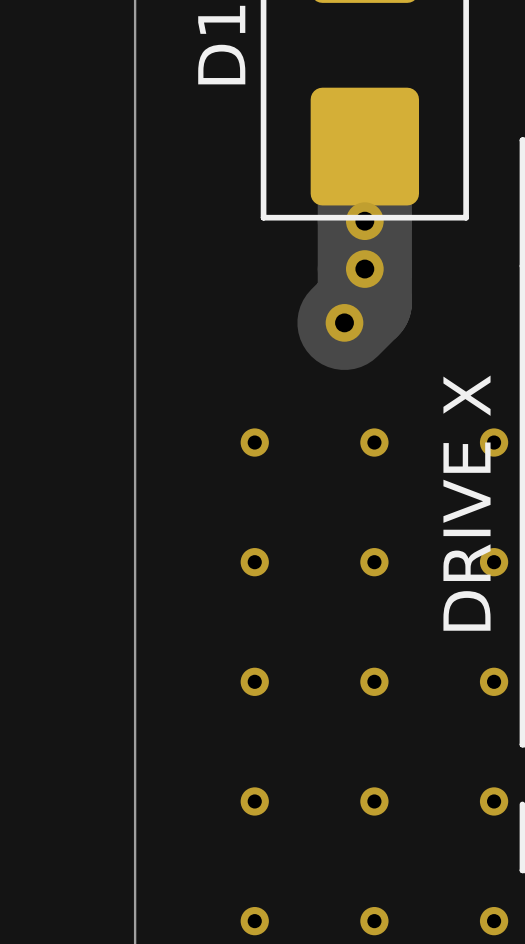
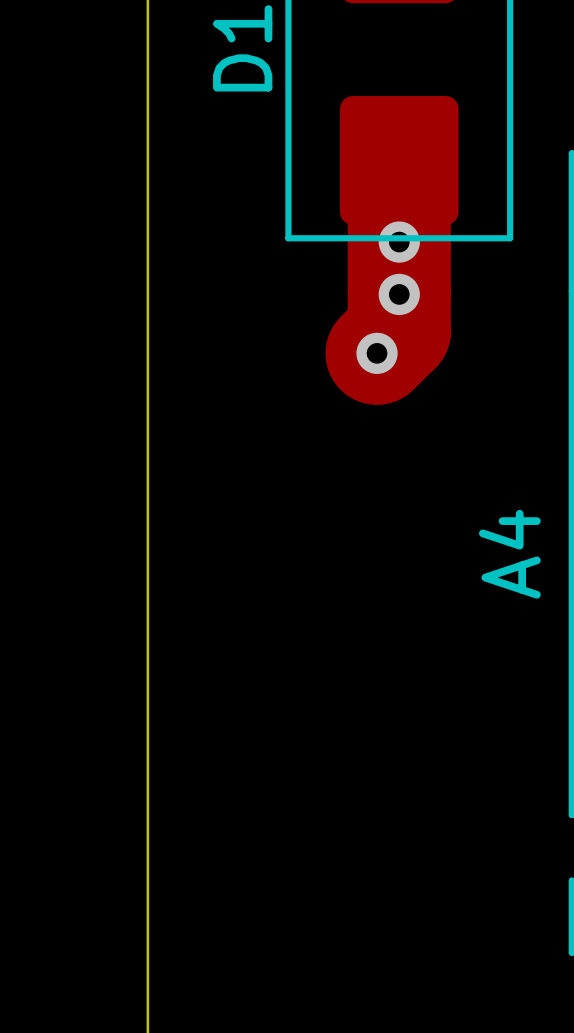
via: (254, 442) -> none
via: (374, 442) -> none
via: (494, 442) -> none
DRIVE X name: DRIVE X (466, 503) -> A4 (509, 554)
via: (254, 562) -> none
via: (374, 562) -> none
via: (494, 562) -> none
via: (254, 681) -> none
via: (374, 681) -> none
via: (494, 681) -> none
via: (254, 801) -> none
via: (374, 801) -> none
via: (494, 801) -> none
via: (254, 921) -> none
via: (374, 921) -> none
via: (494, 921) -> none

